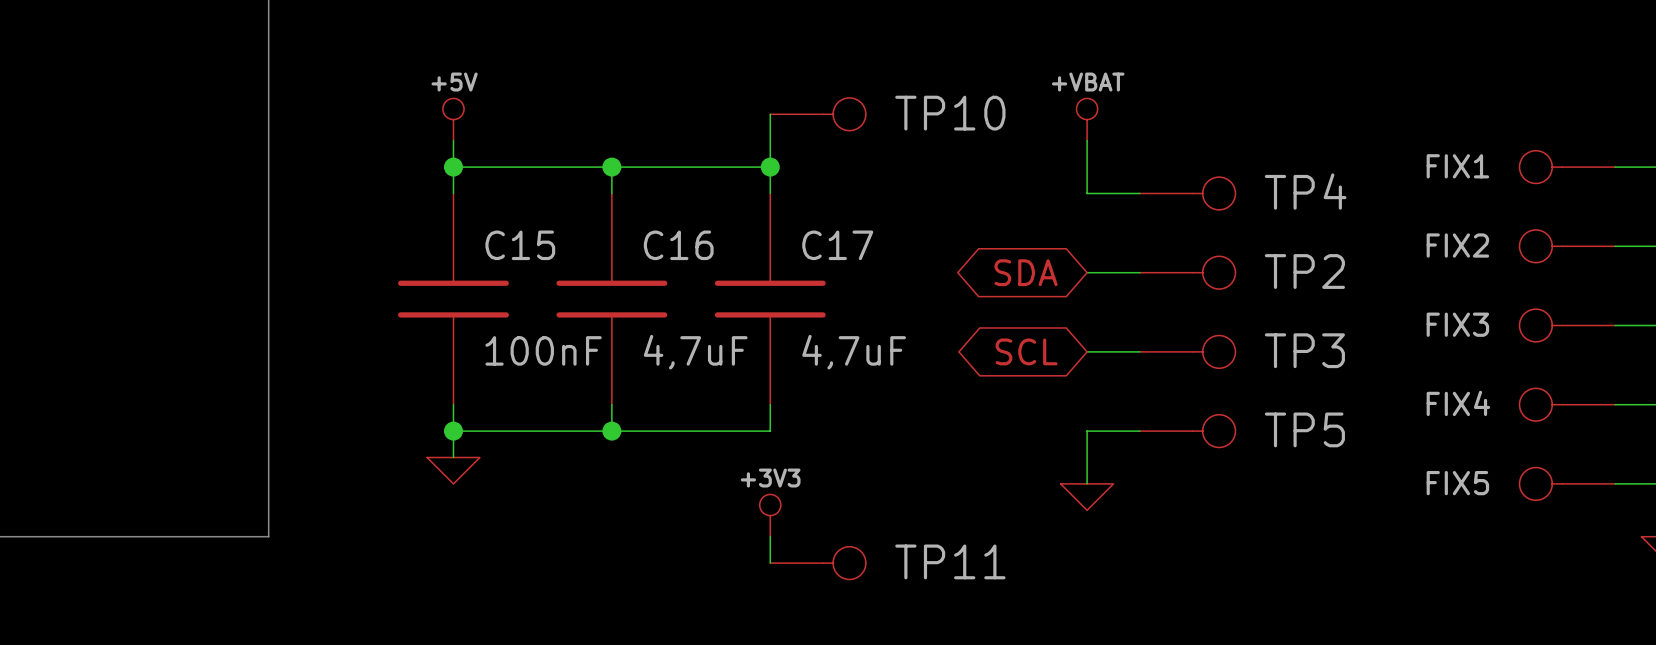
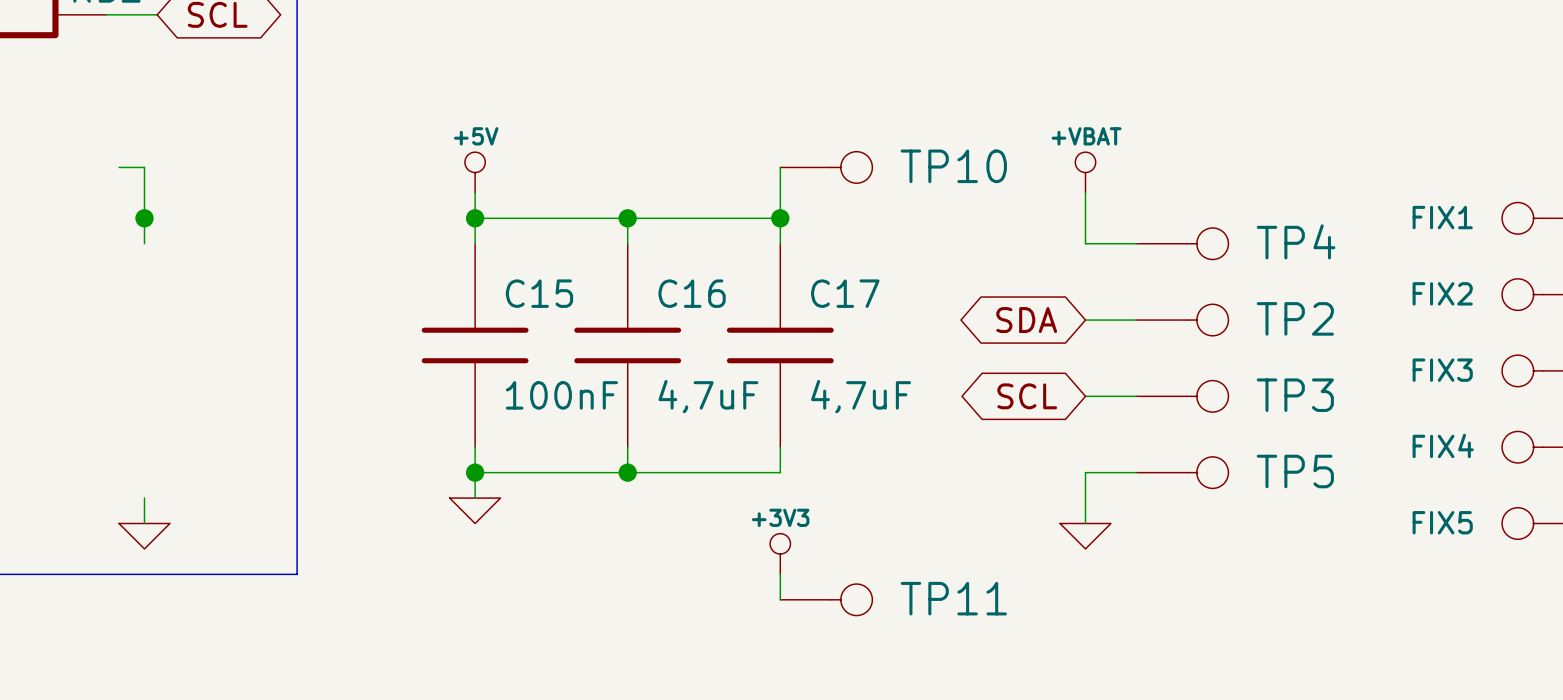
wire: none -> (119, 167) (144, 167) (144, 243)
junction: none -> (144, 218)
wire: none -> (144, 498) (144, 523)
power symbol: none -> (144, 536)

